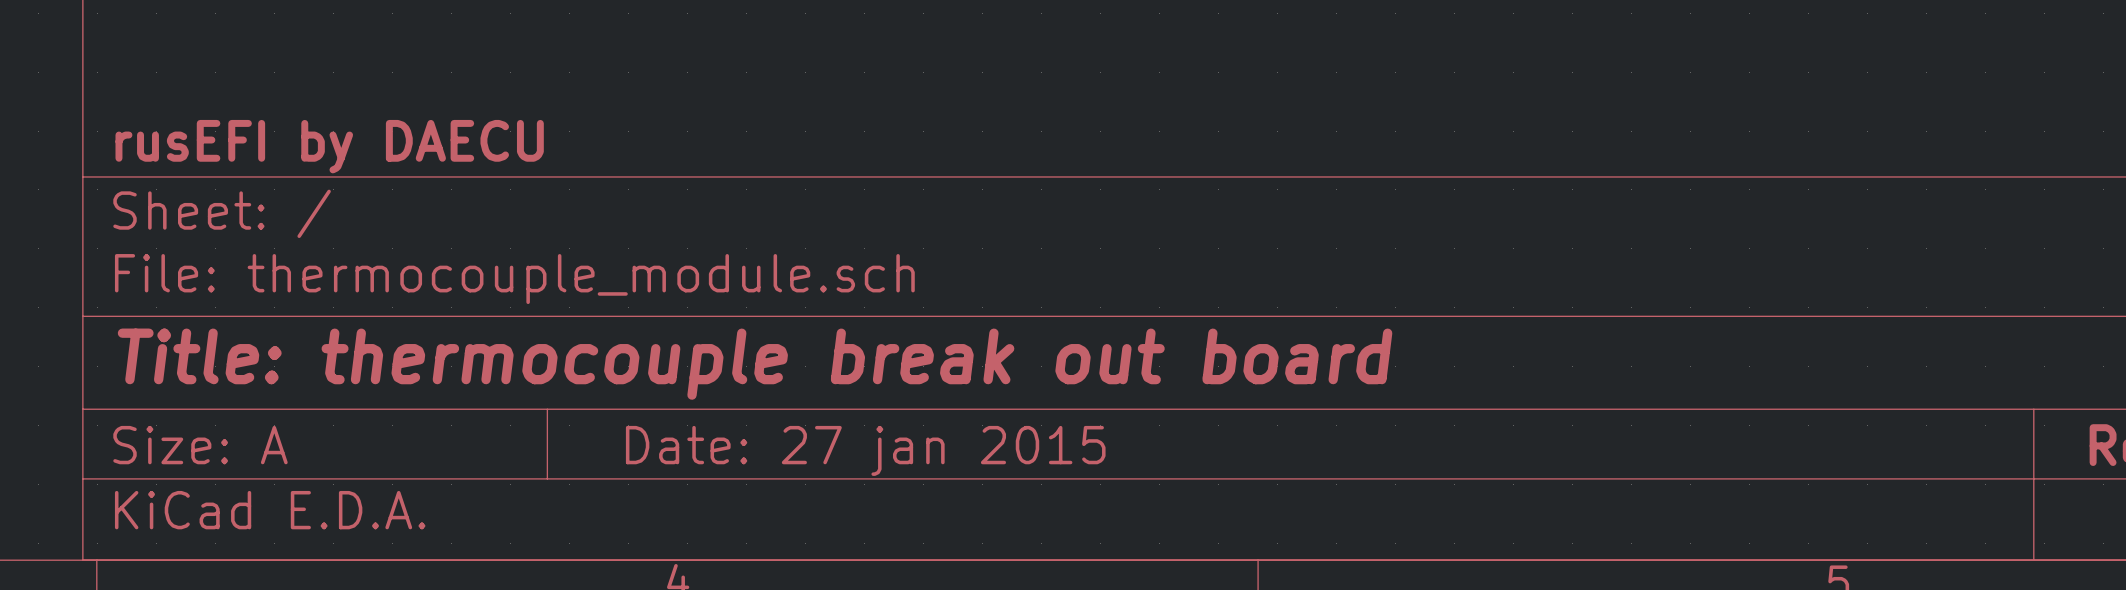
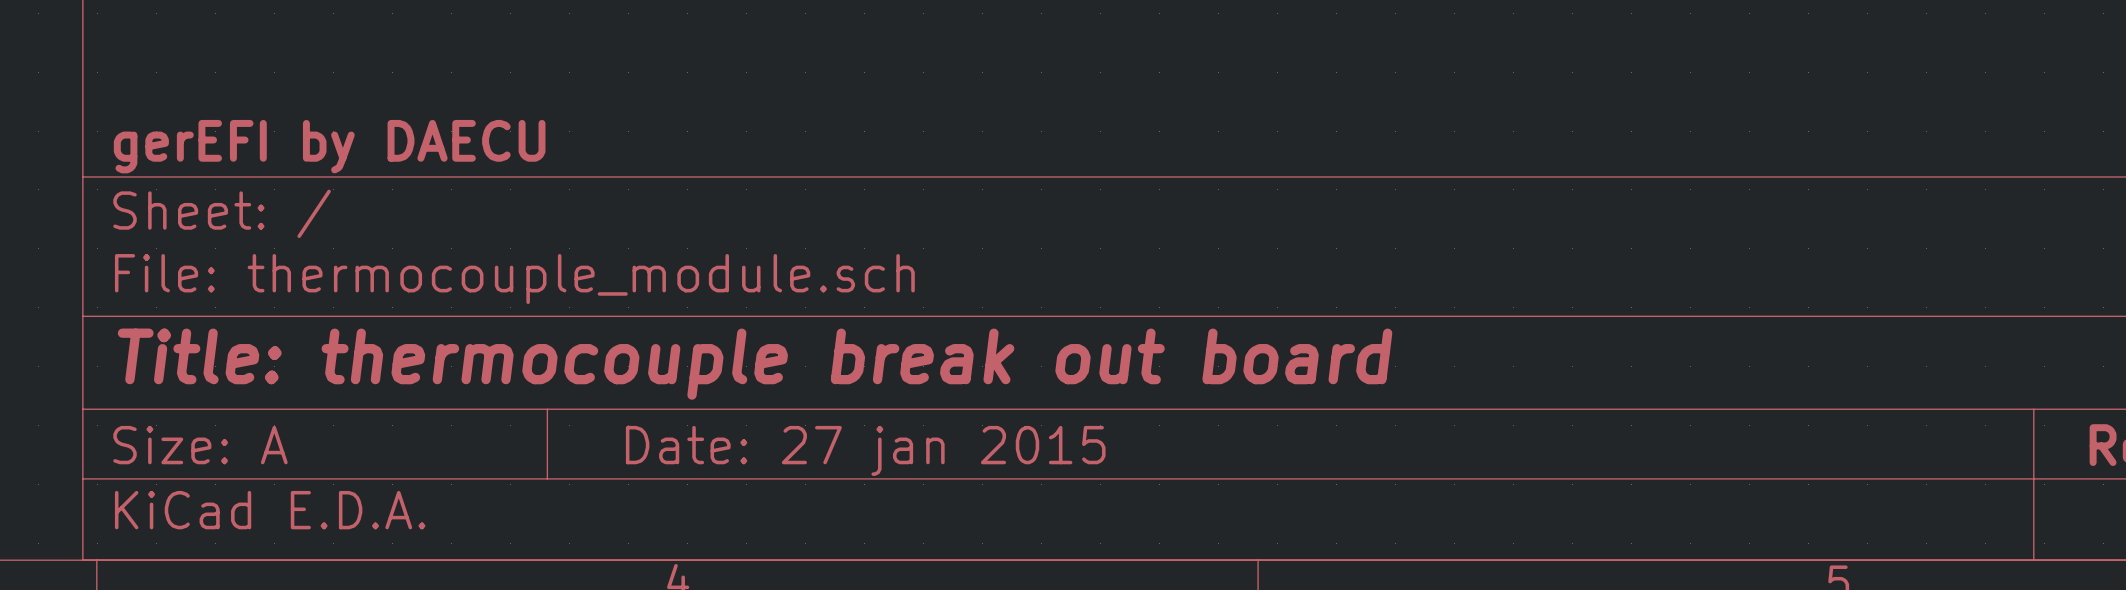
title block: rusEFI by DAECU (329, 146) -> gerEFI by DAECU (329, 146)

